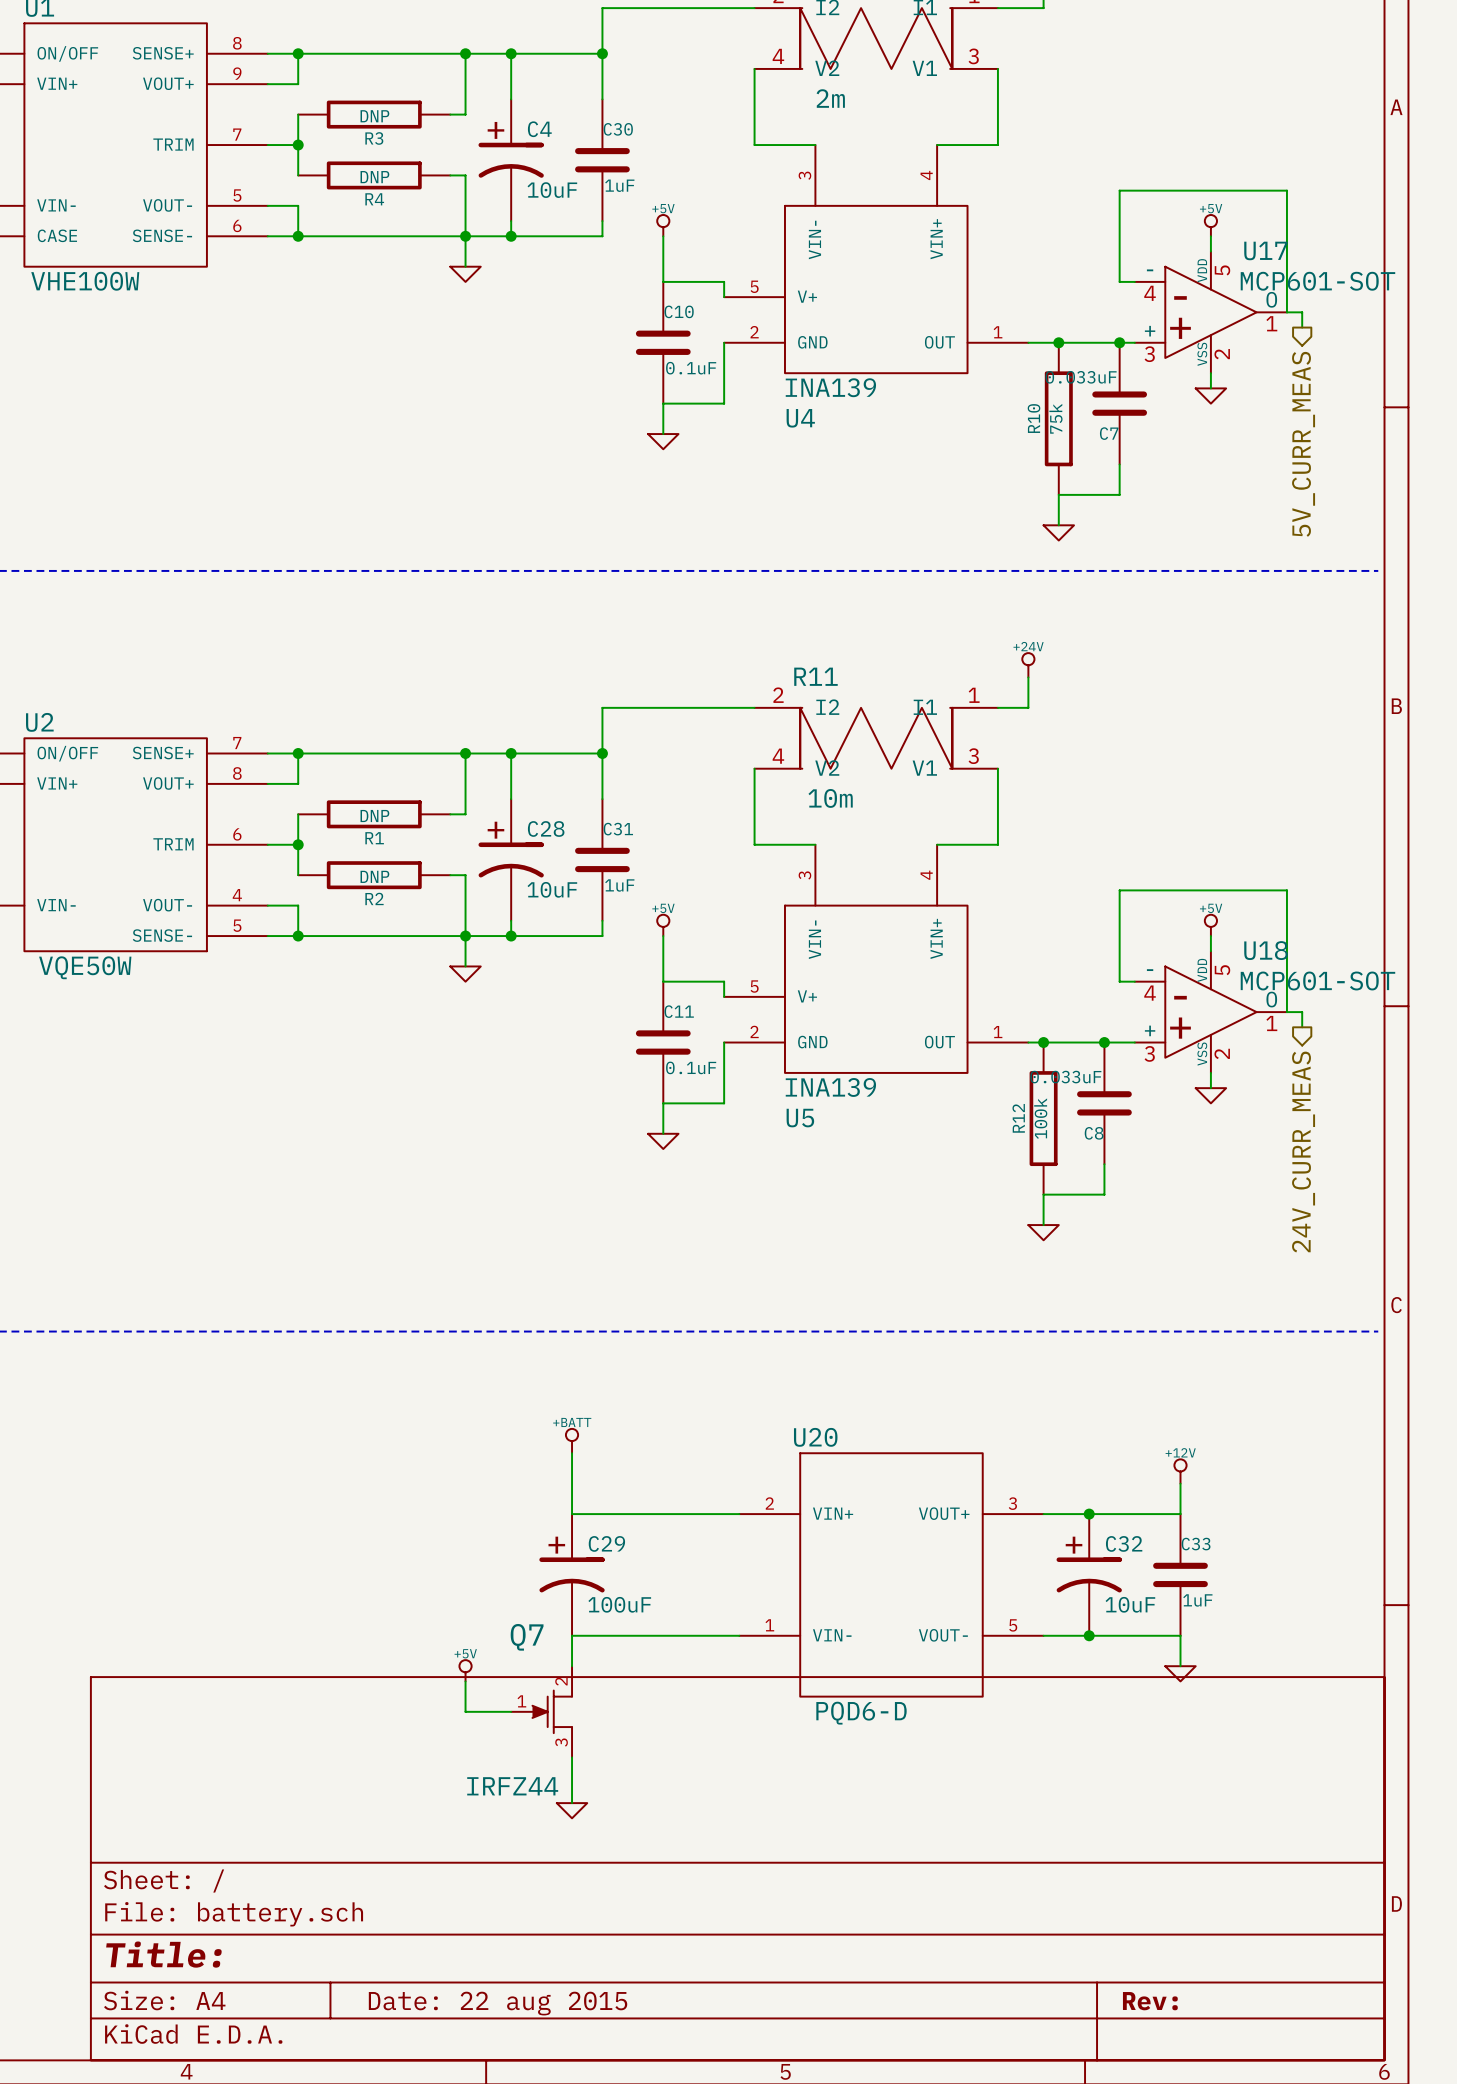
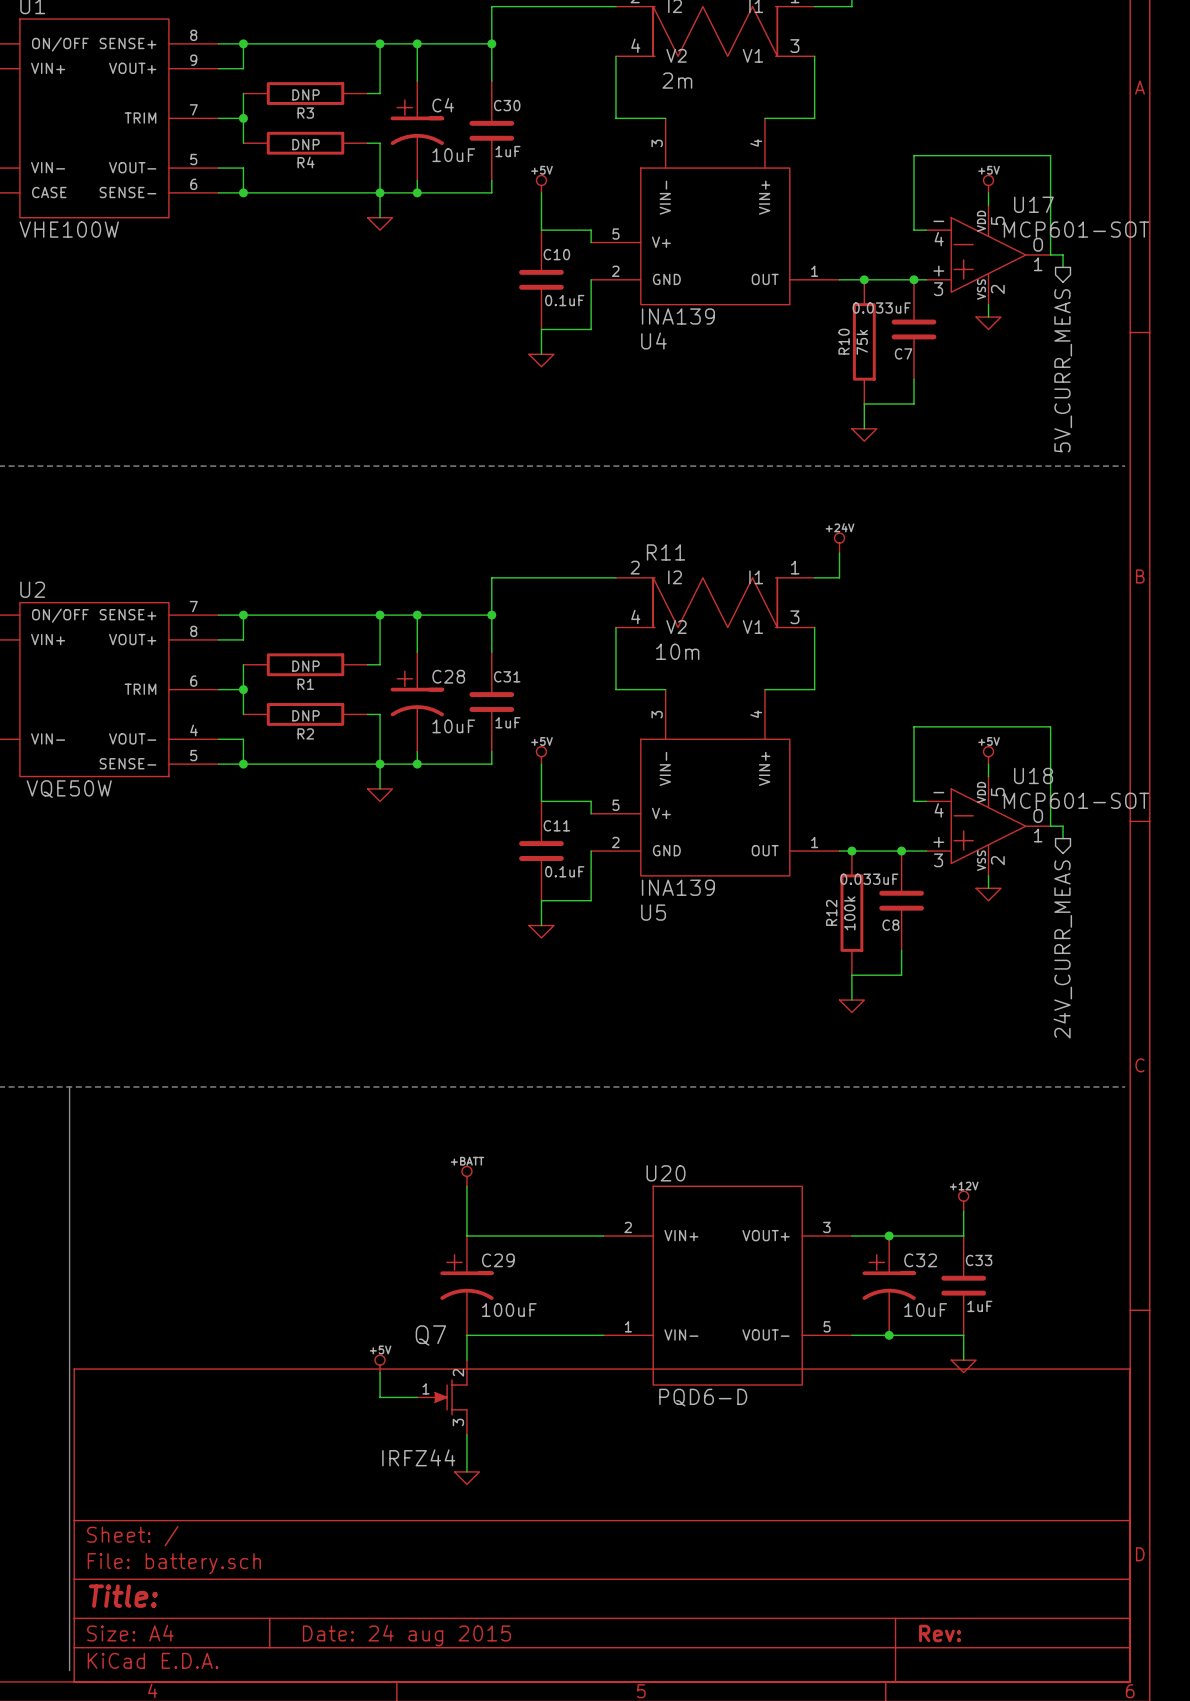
bus: none -> (69, 1086) (69, 1670)
title block: Date: 22 aug 2015 (498, 2003) -> Date: 24 aug 2015 (406, 1635)

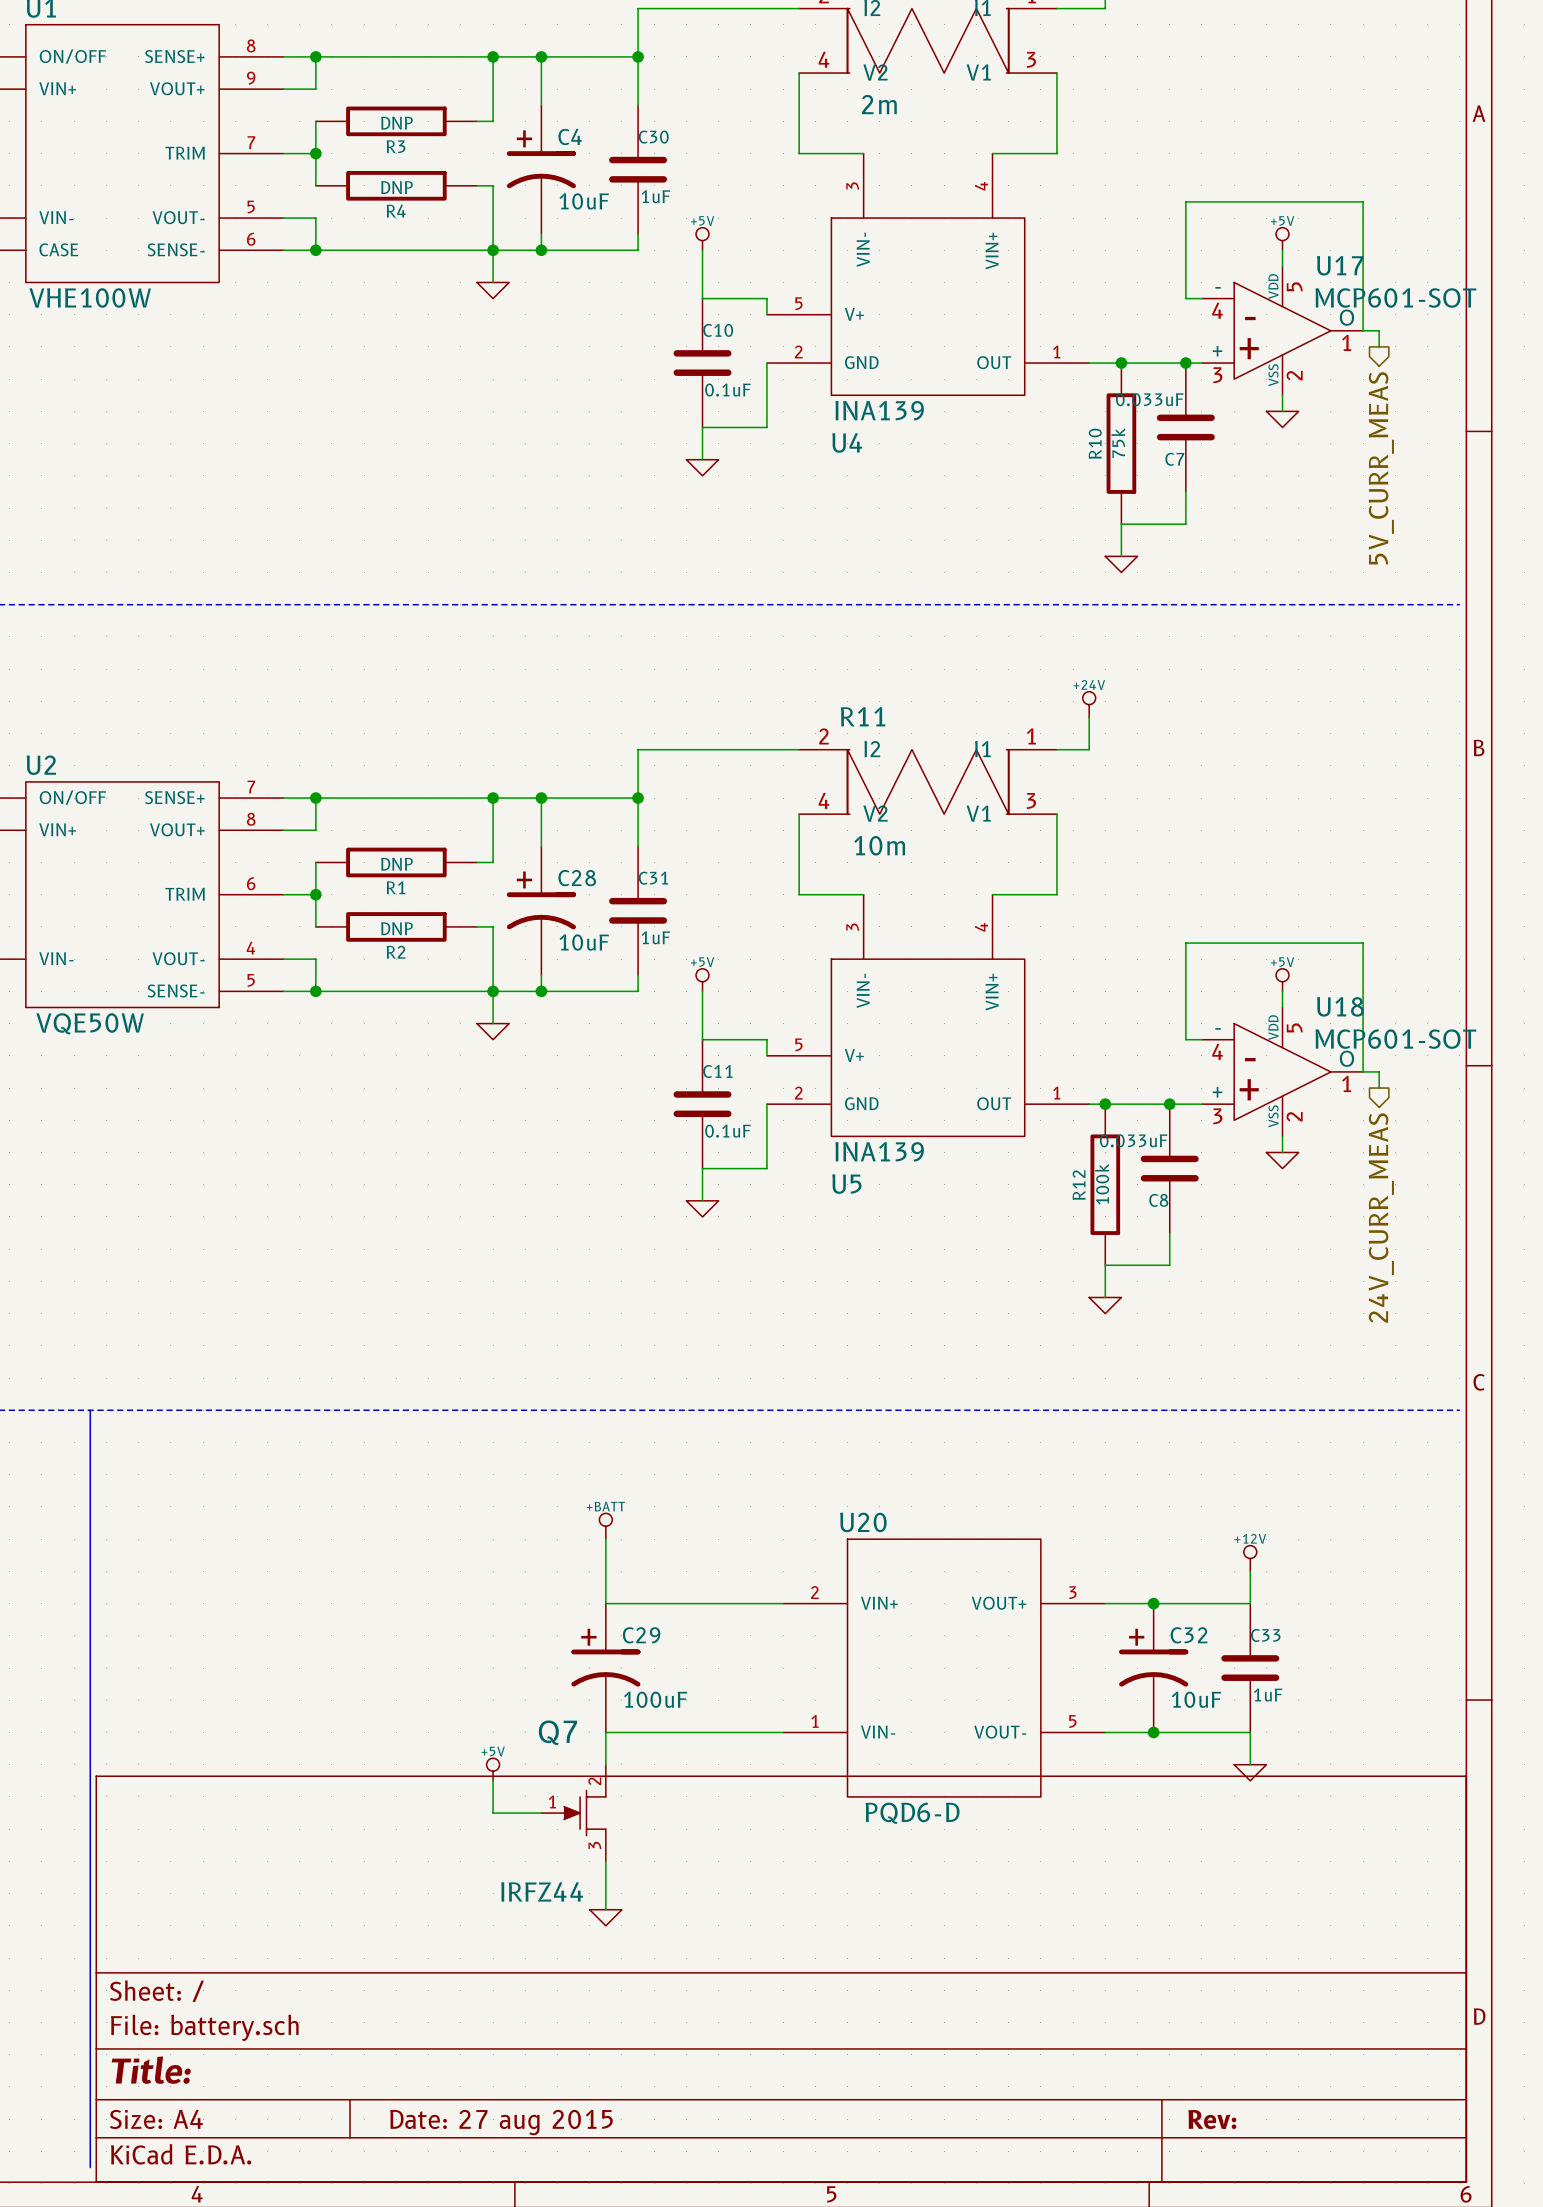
title block: Date: 24 aug 2015 (406, 1635) -> Date: 27 aug 2015 (501, 2122)

